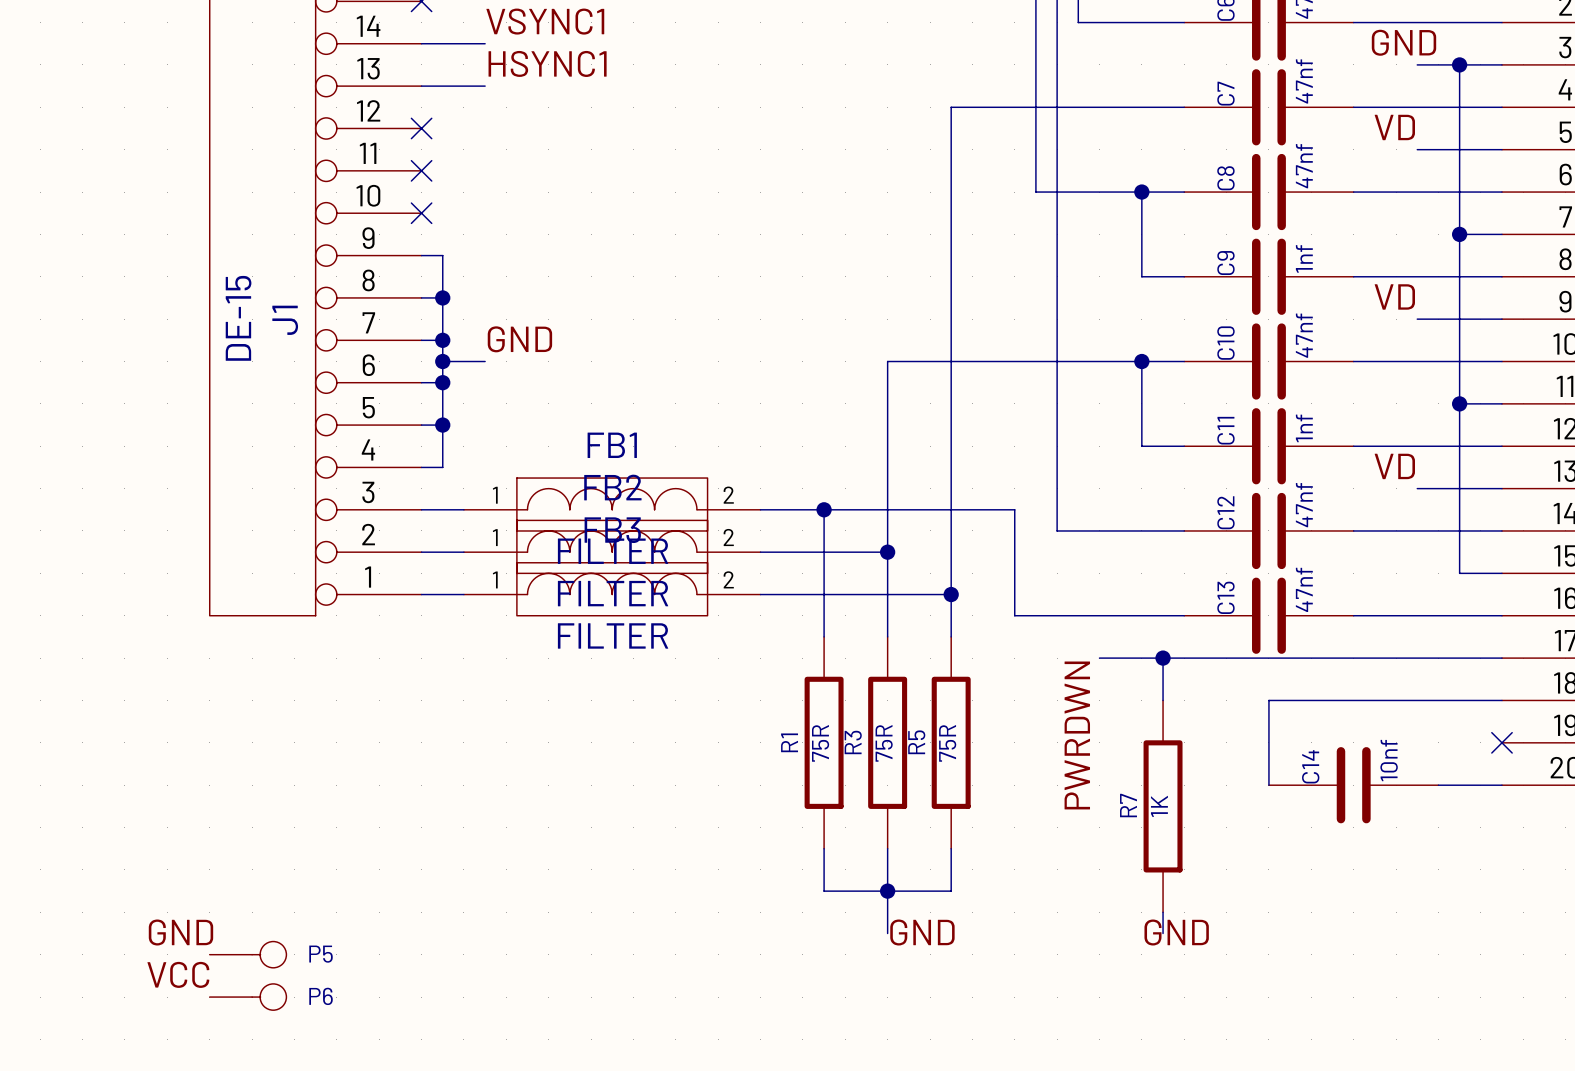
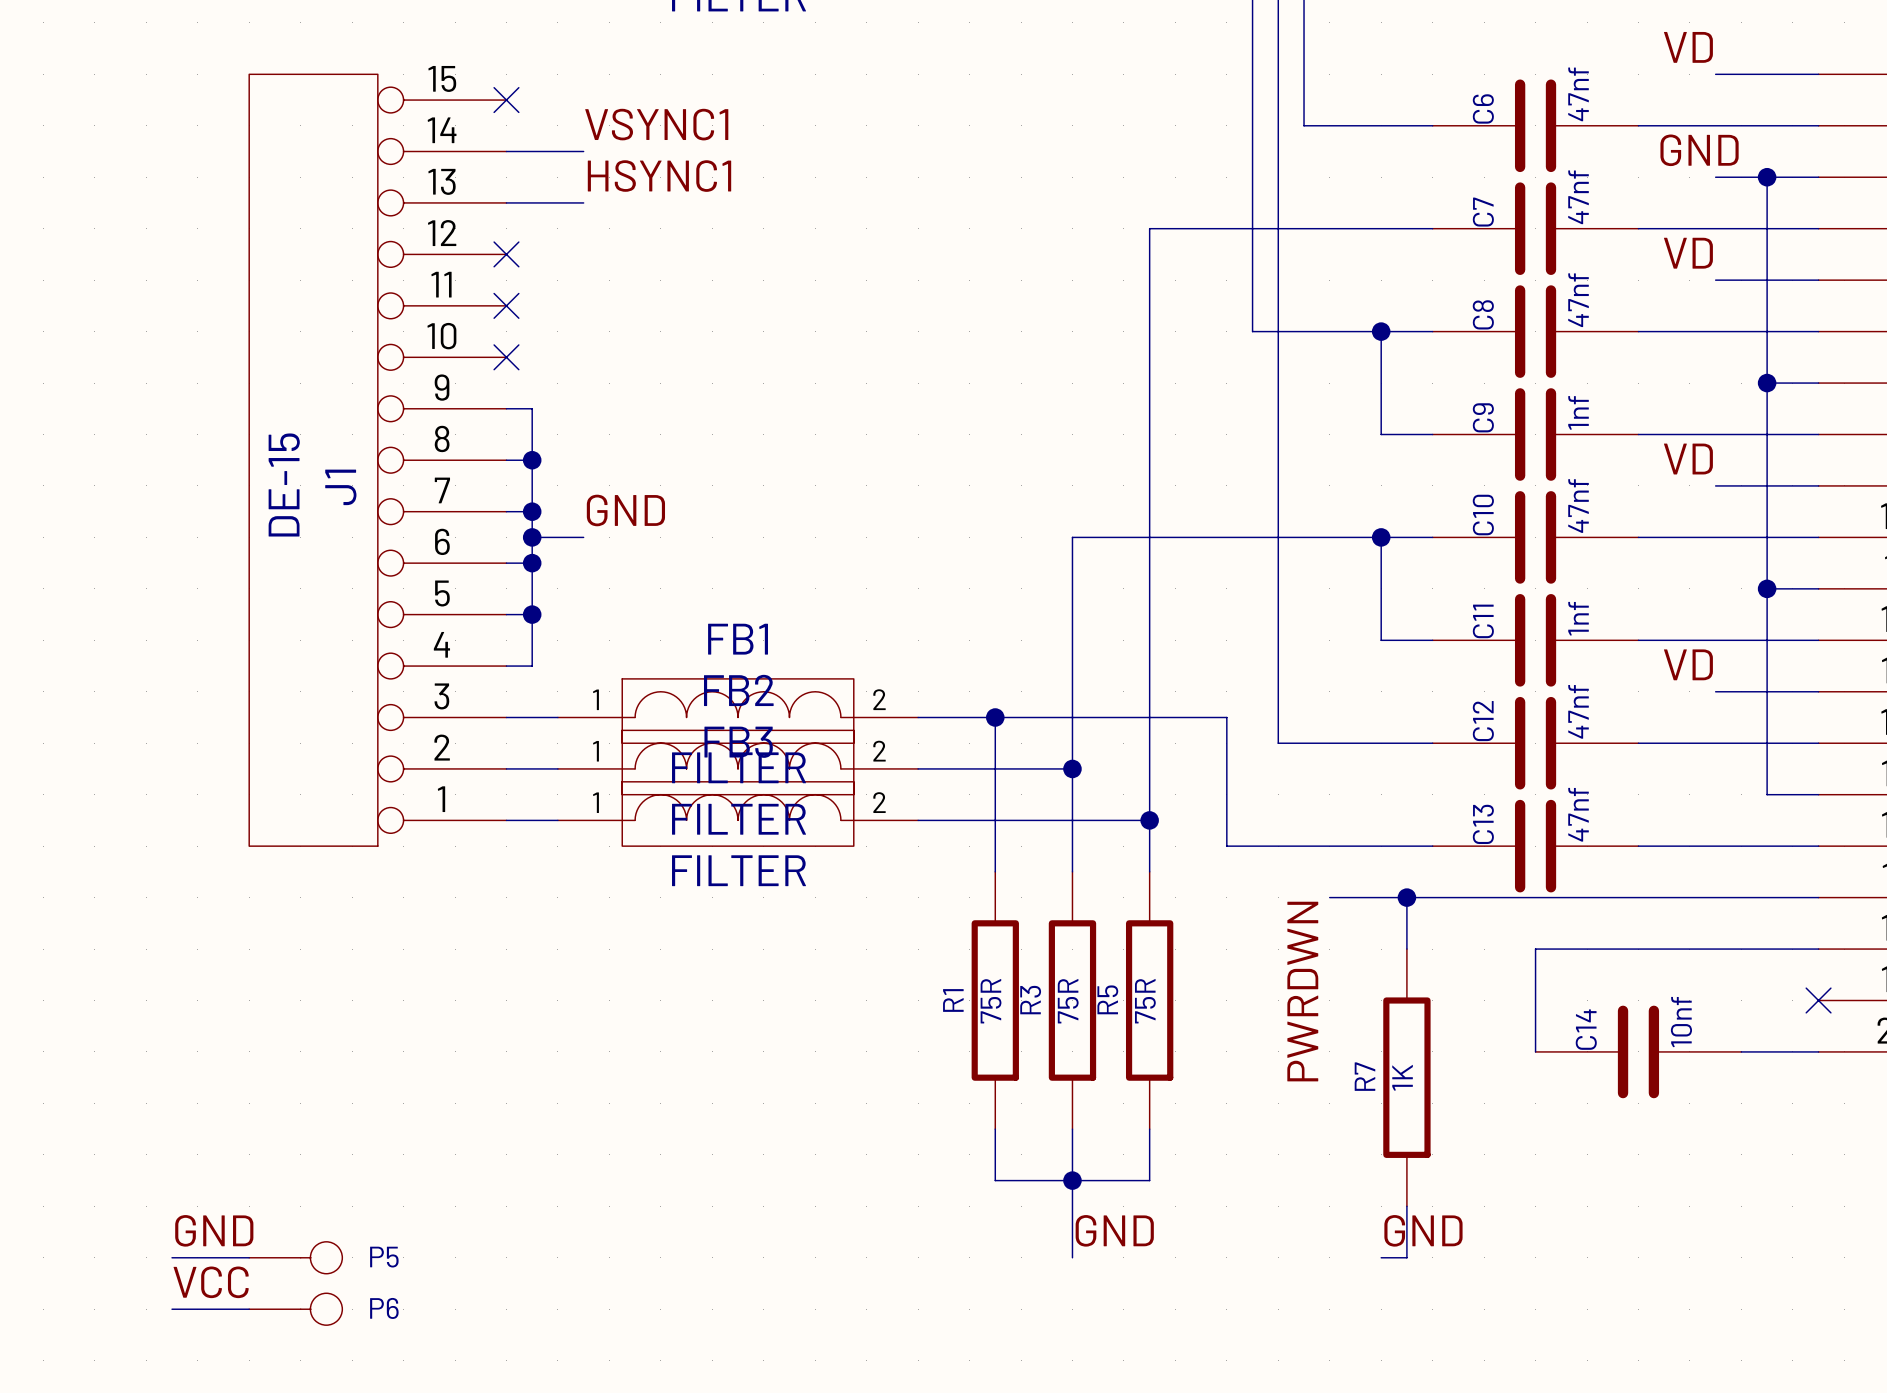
wire: none -> (1072, 1232) (1072, 1257)
wire: none -> (1406, 1232) (1406, 1257) (1381, 1257)
wire: none -> (172, 1257) (249, 1257)
wire: none -> (172, 1309) (249, 1309)

